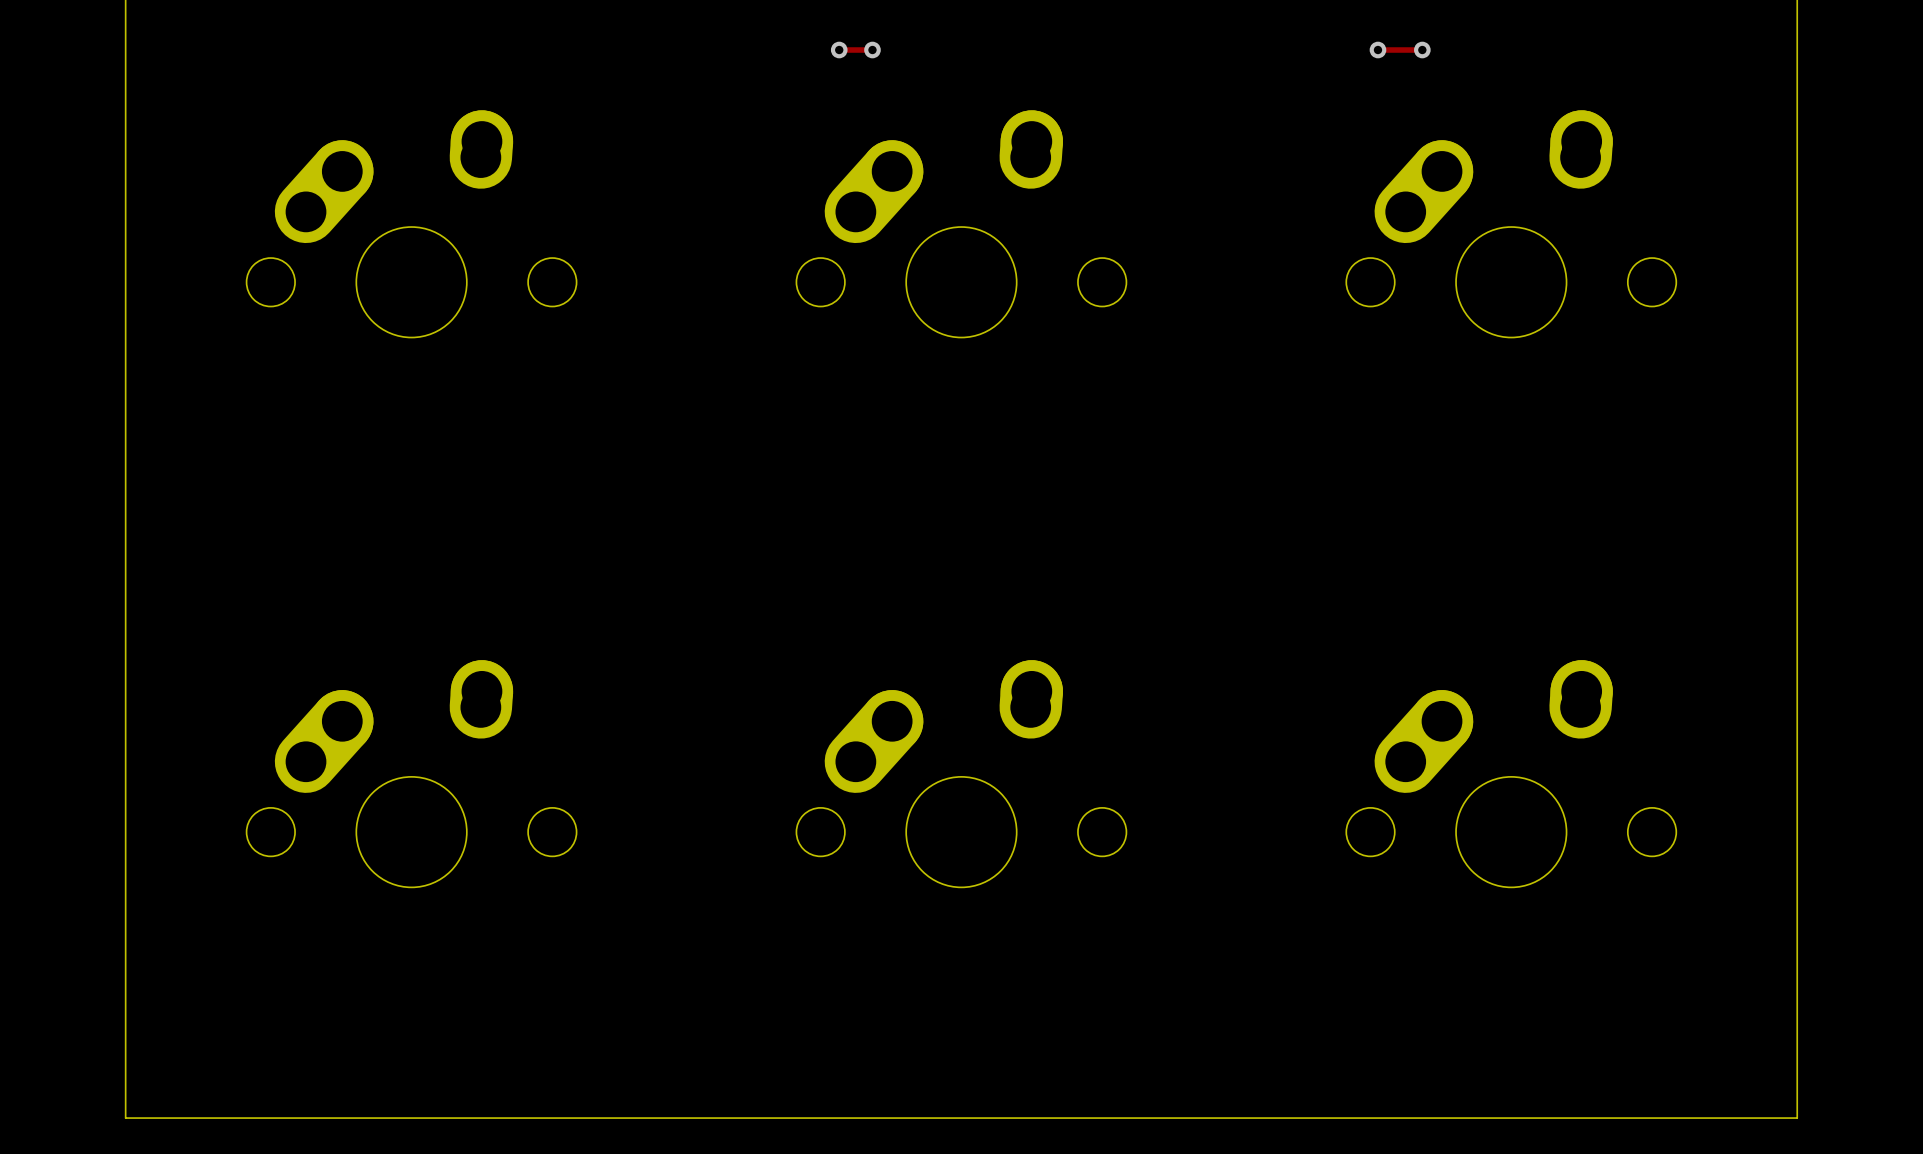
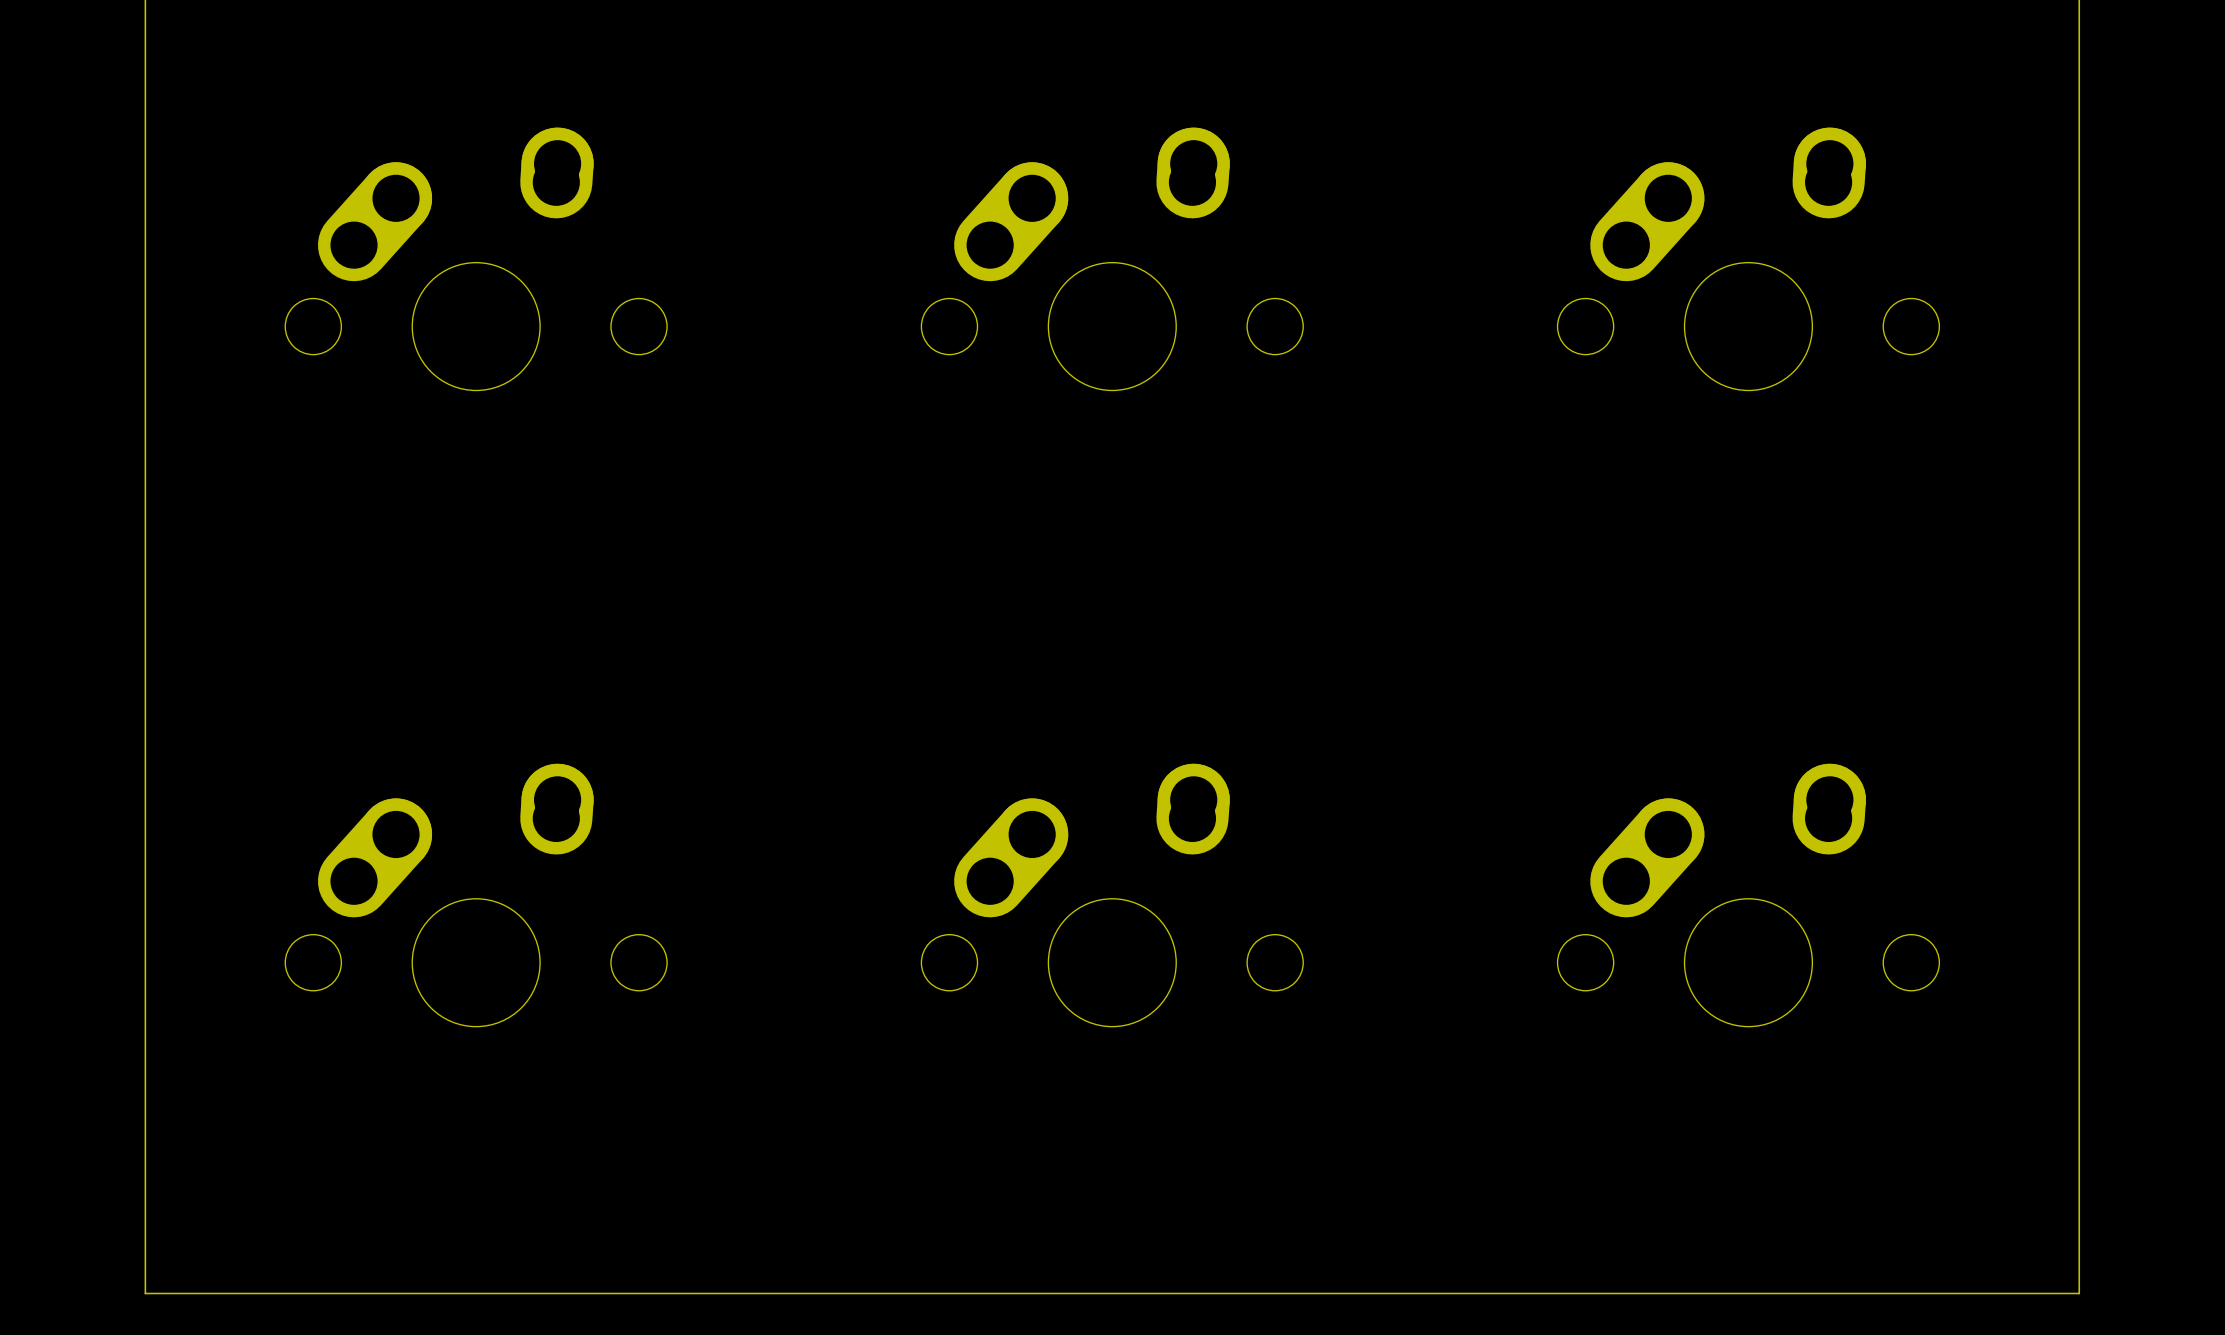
track: (839, 50) (872, 50) -> none
via: (839, 50) -> none
via: (872, 50) -> none
track: (1377, 50) (1422, 50) -> none
via: (1377, 50) -> none
via: (1422, 50) -> none

